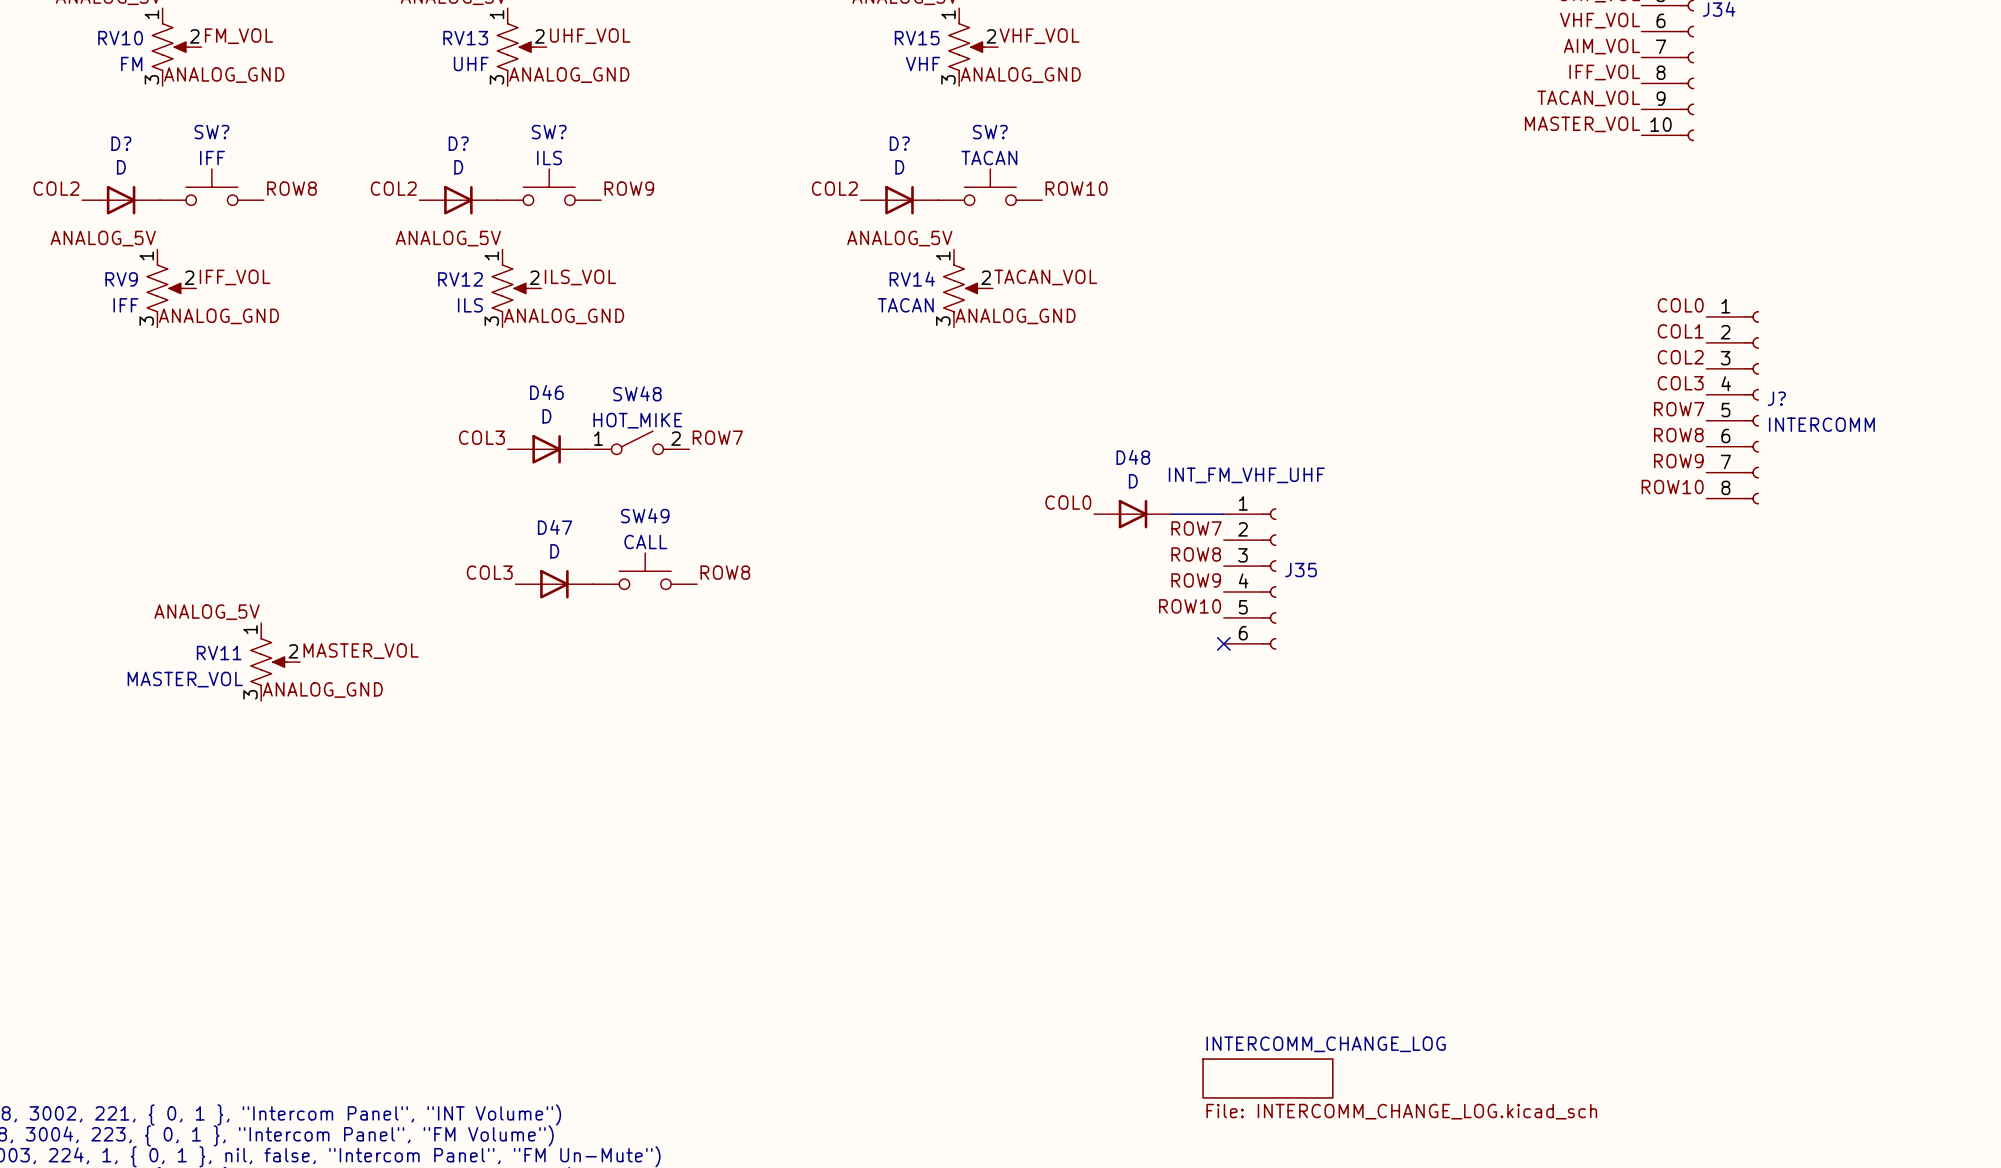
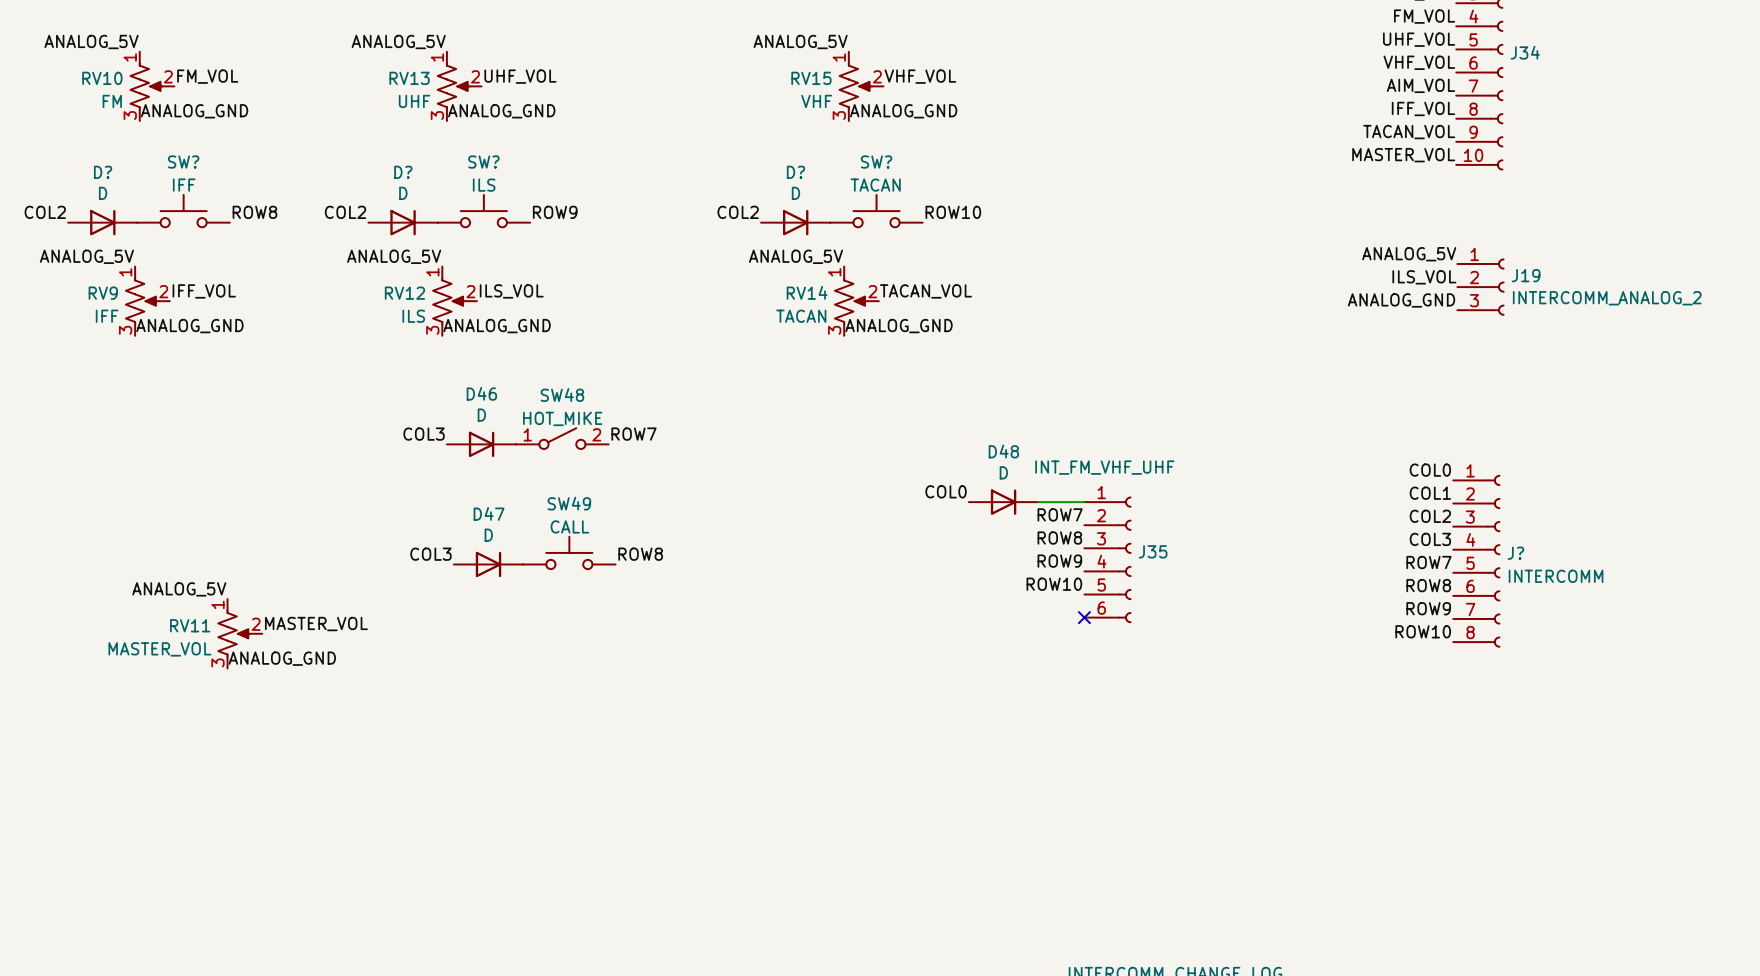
label: none -> ANALOG_5V (1409, 254)
label: none -> ILS_VOL (1424, 277)
J19: none -> INTERCOMM_ANALOG_2 (1480, 287)
label: none -> ANALOG_GND (1401, 300)
label position: COL0 (1680, 305) -> COL0 (1430, 470)
label position: COL1 (1680, 331) -> COL1 (1430, 493)
label position: COL2 (1680, 357) -> COL2 (1430, 516)
label position: COL3 (1680, 383) -> COL3 (1430, 539)
J?: INTERCOMM (1732, 407) -> none
label position: ROW7 (1679, 409) -> ROW7 (1428, 562)
label position: ROW8 (1678, 435) -> ROW8 (1428, 585)
label position: ROW9 (1678, 461) -> ROW9 (1428, 608)
label position: ROW10 (1672, 487) -> ROW10 (1423, 631)
J?: none -> INTERCOMM (1476, 561)

